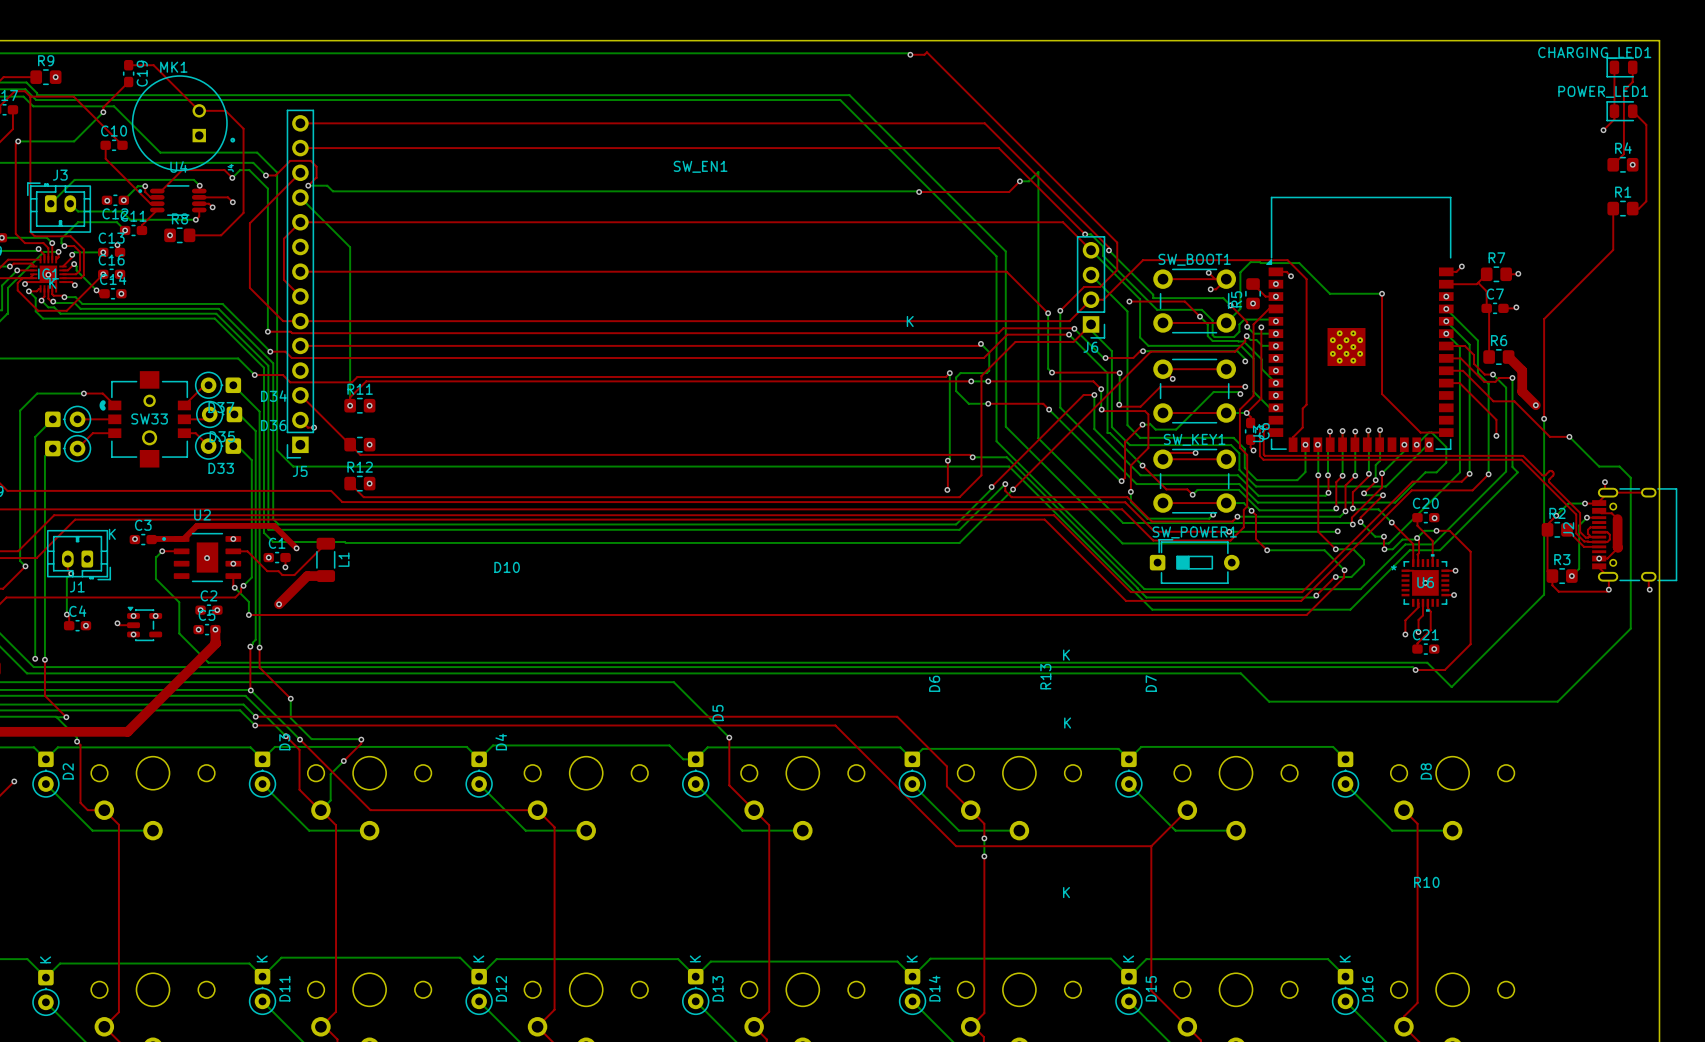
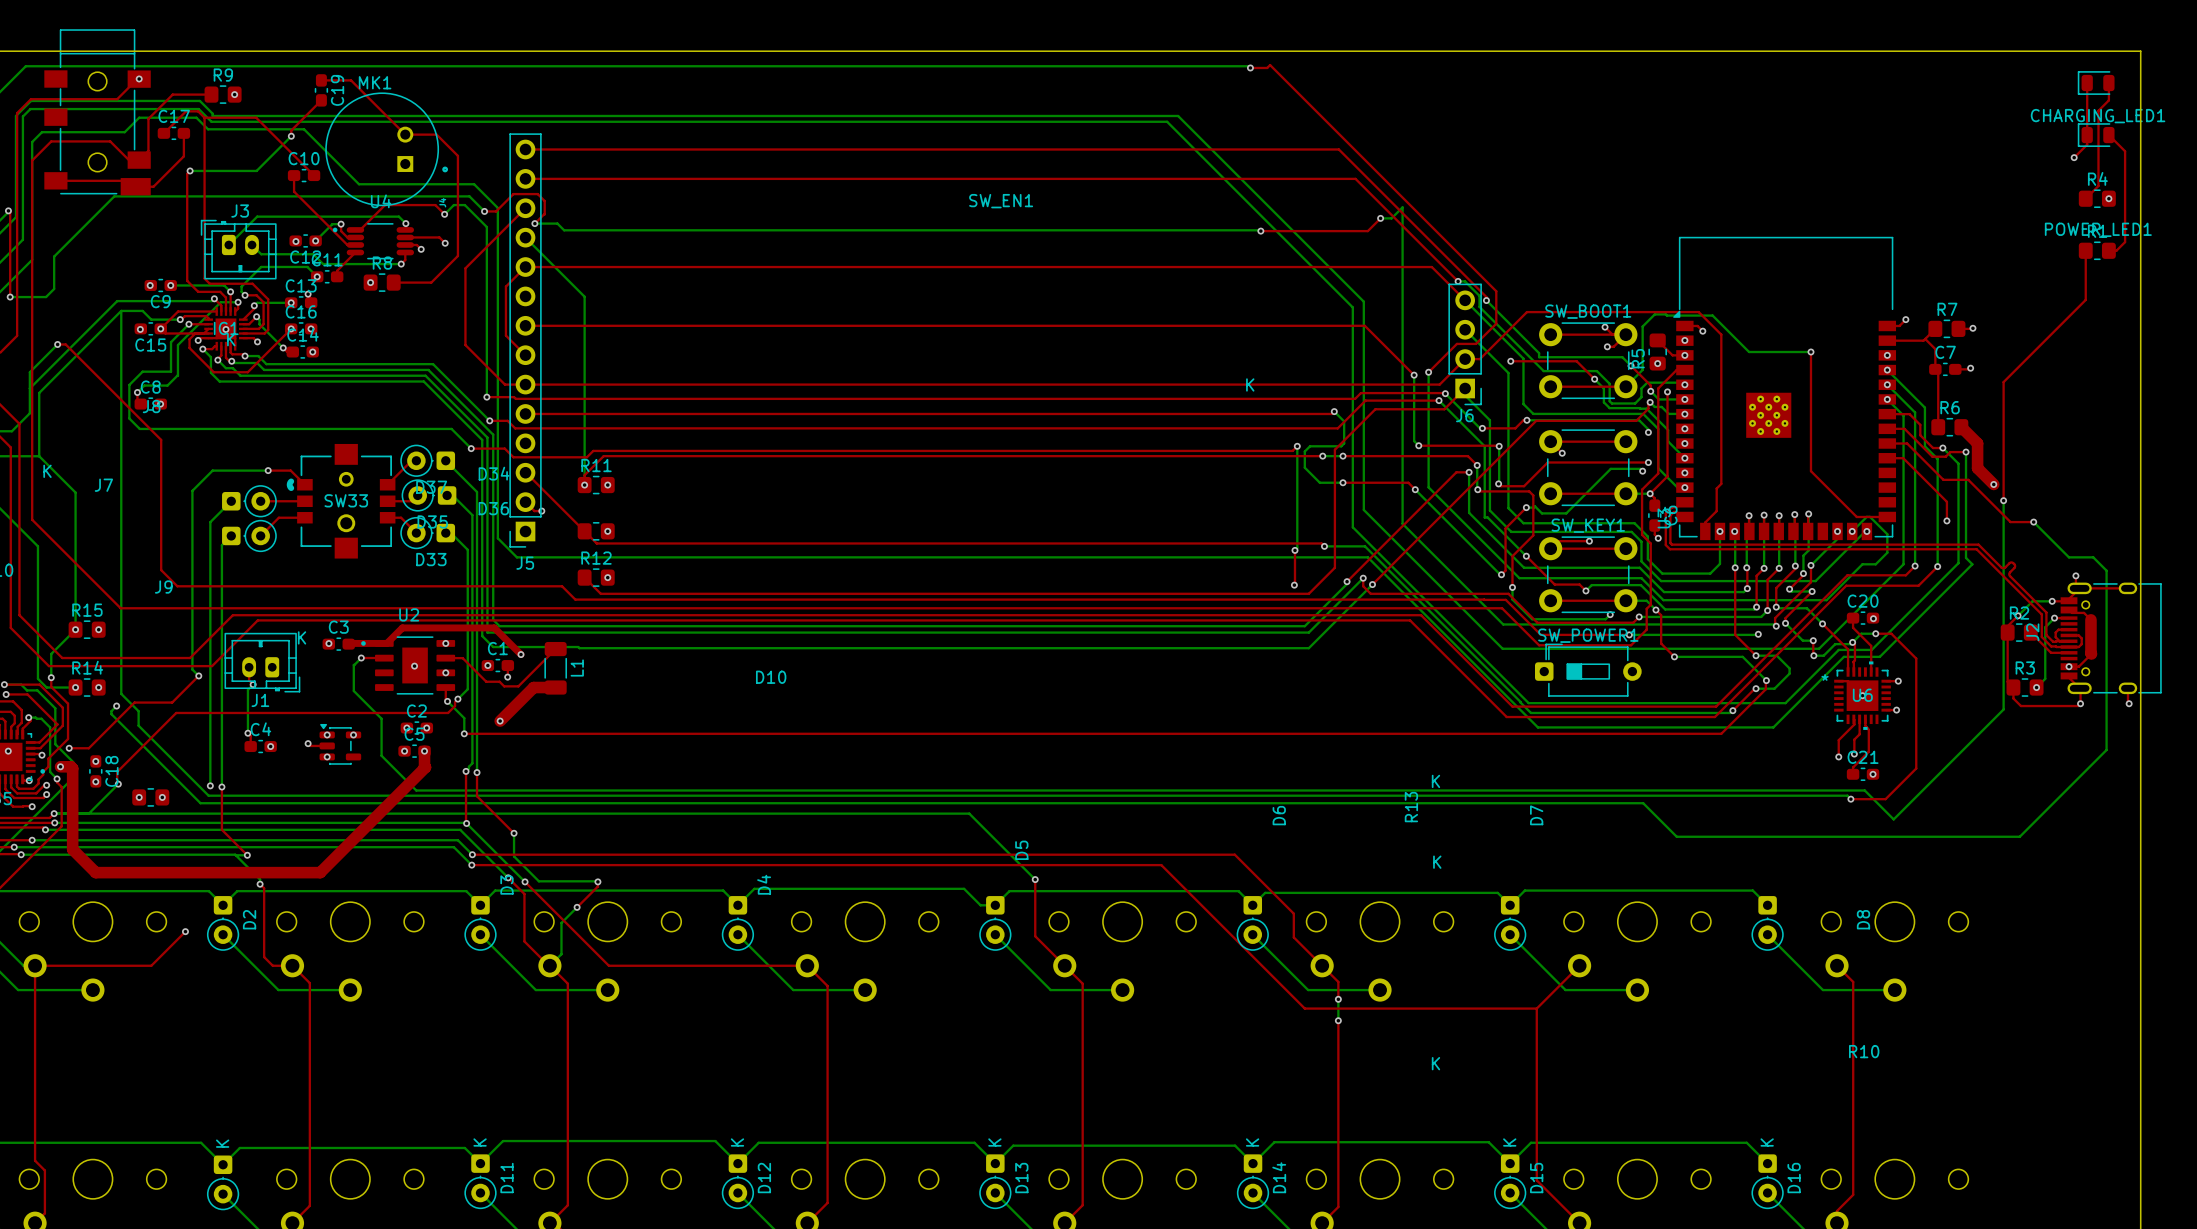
CHARGING_LED1 name position: CHARGING_LED1 (1594, 53) -> CHARGING_LED1 (2098, 116)
POWER_LED1 name position: POWER_LED1 (1603, 91) -> POWER_LED1 (2098, 229)

